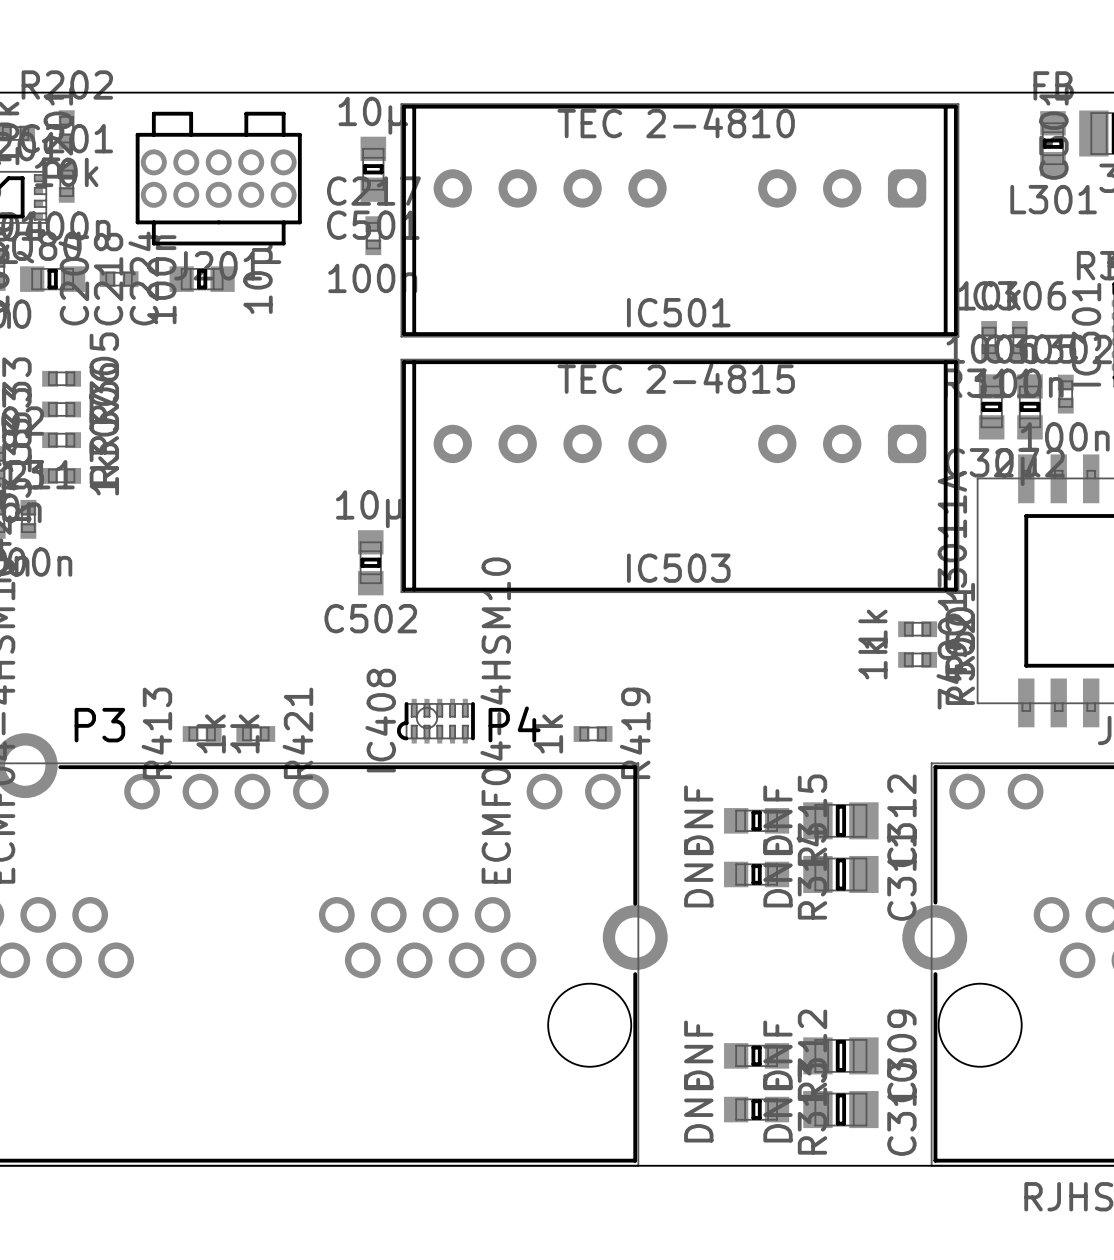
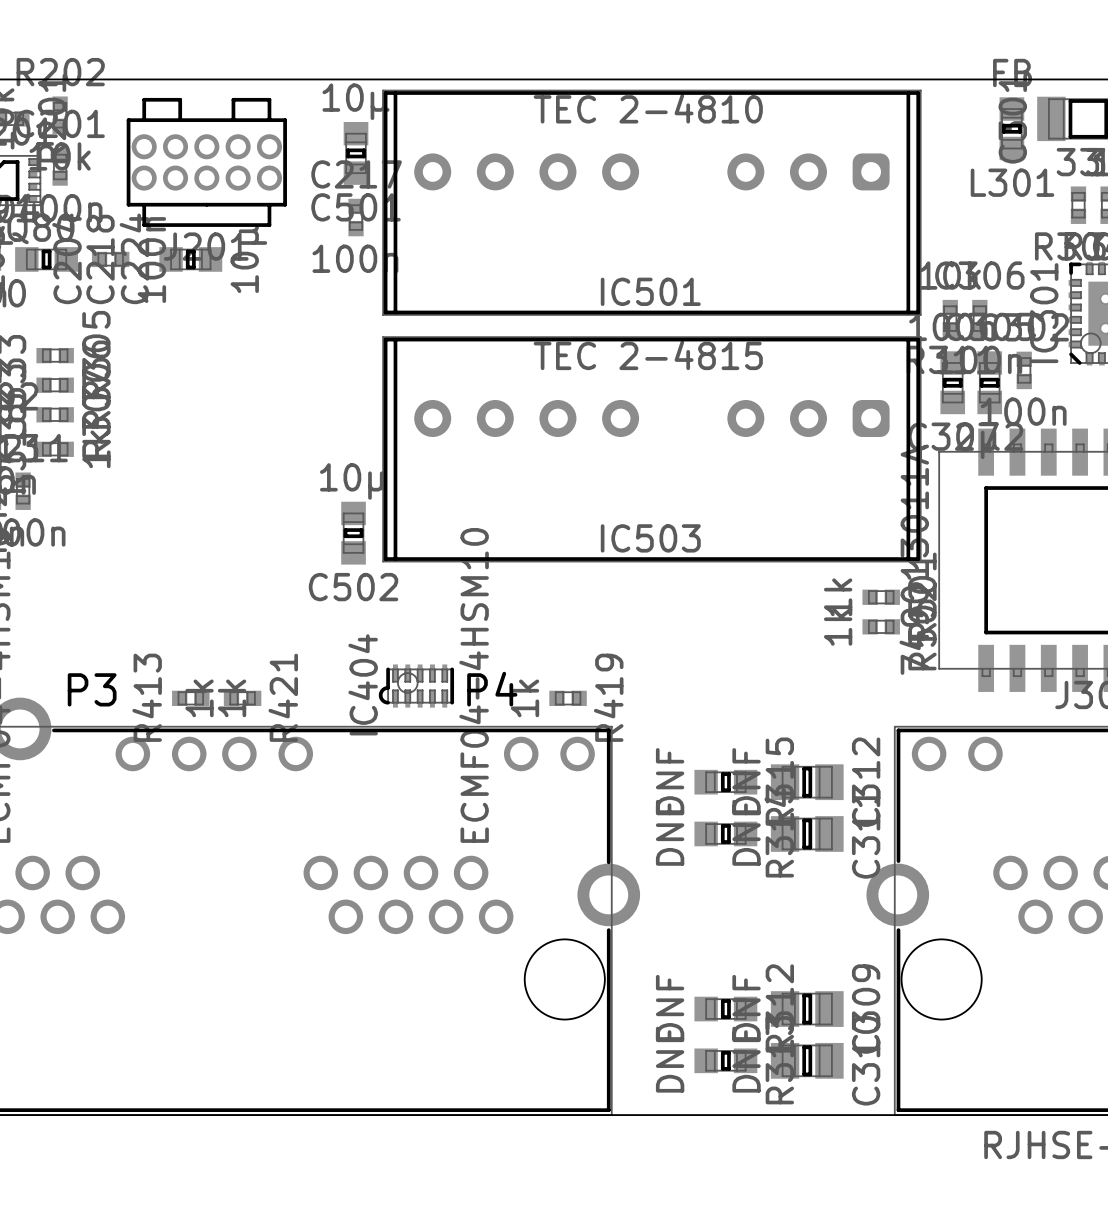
IC408 name: IC408 (380, 720) -> IC404 (363, 684)

